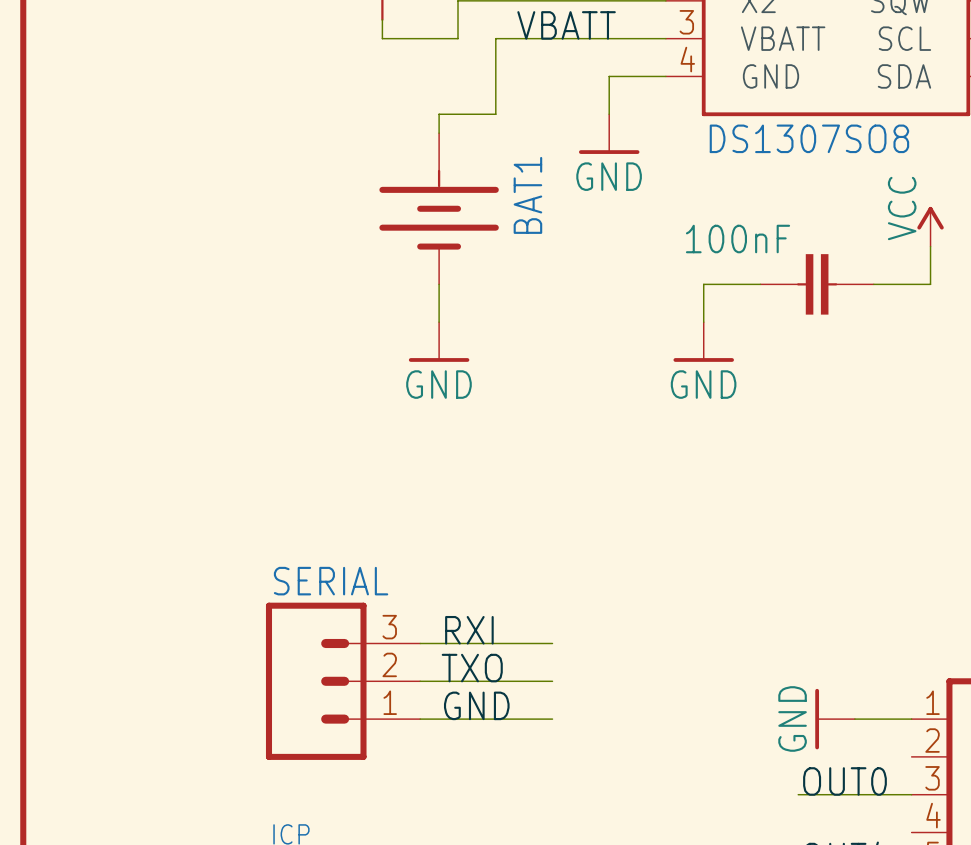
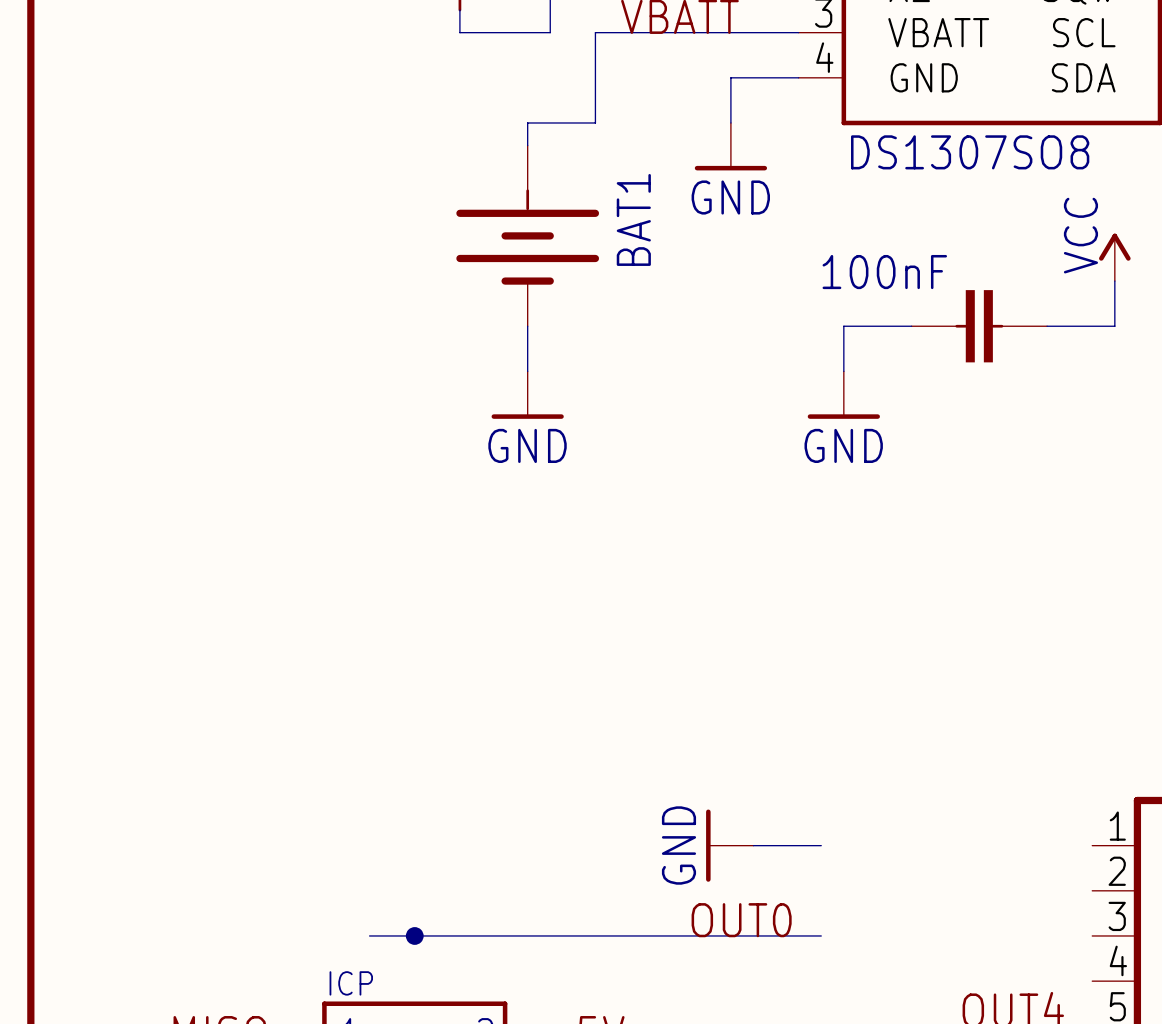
label: RXI (469, 630) -> none
wire: (420, 643) (552, 643) -> none
label: TXO (472, 668) -> none
SERIAL: (343, 681) -> none
wire: (420, 681) (552, 681) -> none
label: GND (476, 705) -> none
wire: (420, 719) (552, 719) -> none
power symbol position: GND (835, 719) -> GND (729, 845)
wire: (854, 719) (911, 719) -> (753, 845) (821, 845)
label position: OUT0 (844, 781) -> OUT0 (741, 920)
wire: none -> (369, 935) (821, 935)
junction: none -> (414, 935)
wire: (798, 794) (911, 794) -> none

